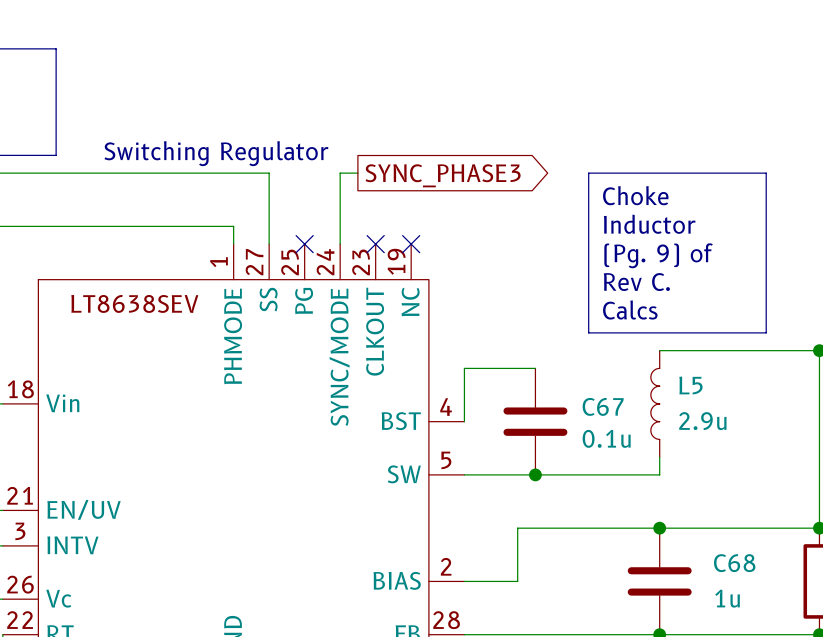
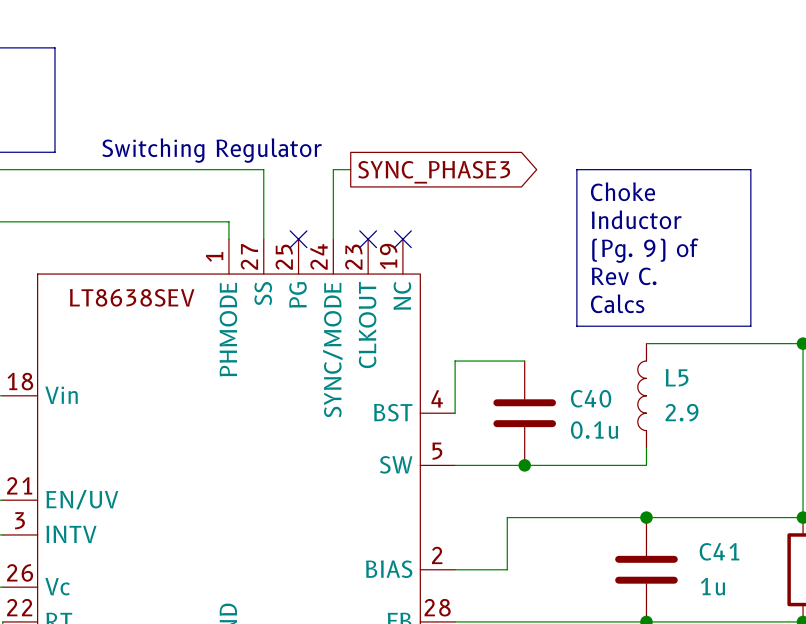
C67 name: C67 (603, 406) -> C40 (591, 398)
L5 value: 2.9u (702, 421) -> 2.9 (682, 412)
C68 name: C68 (734, 563) -> C41 (719, 551)

